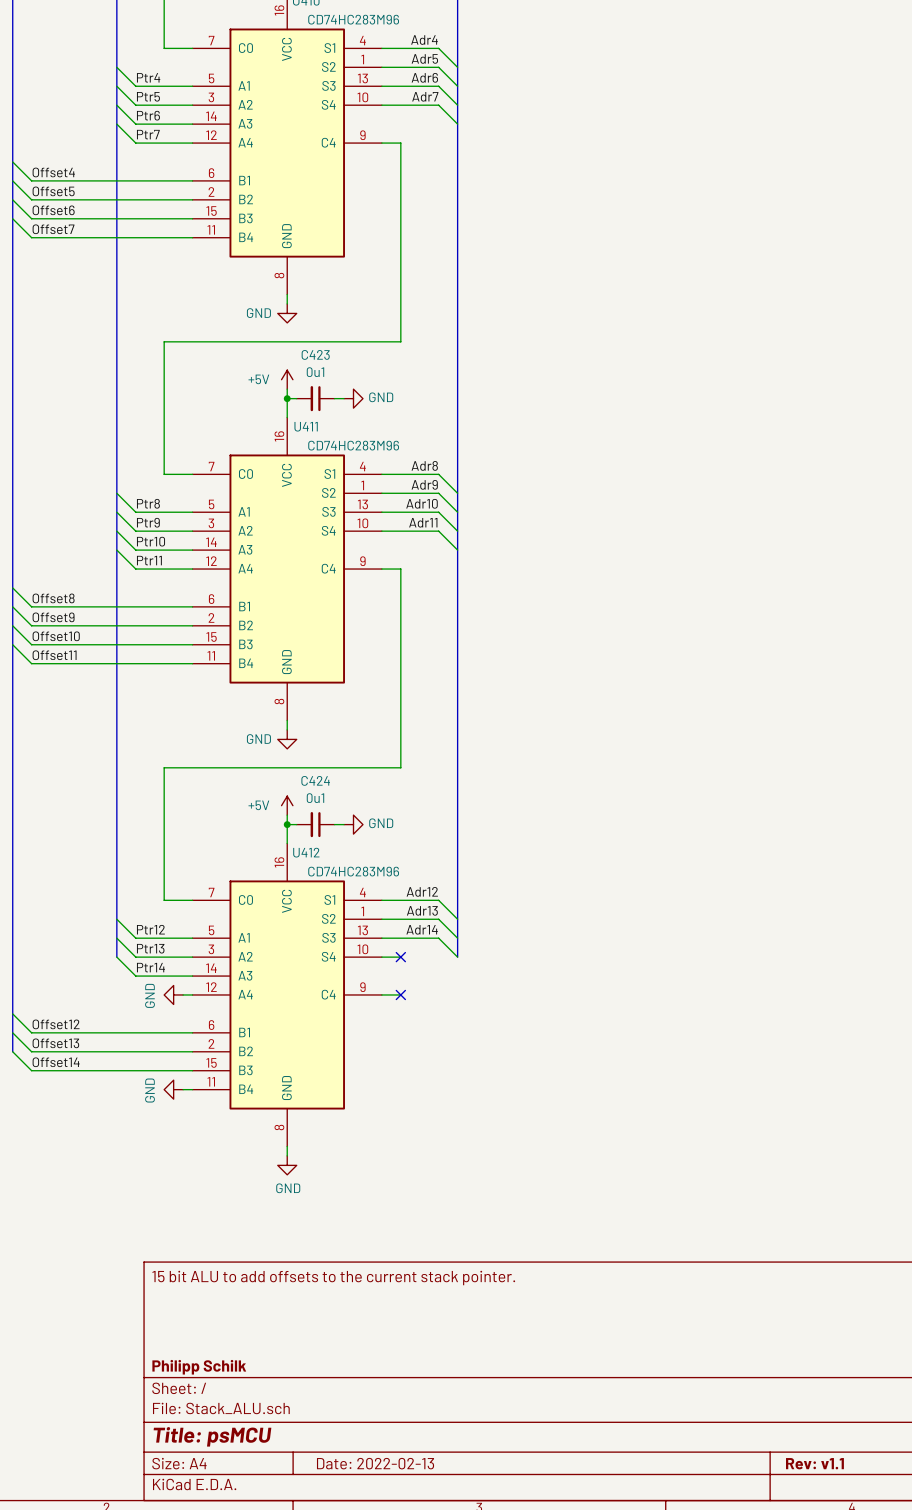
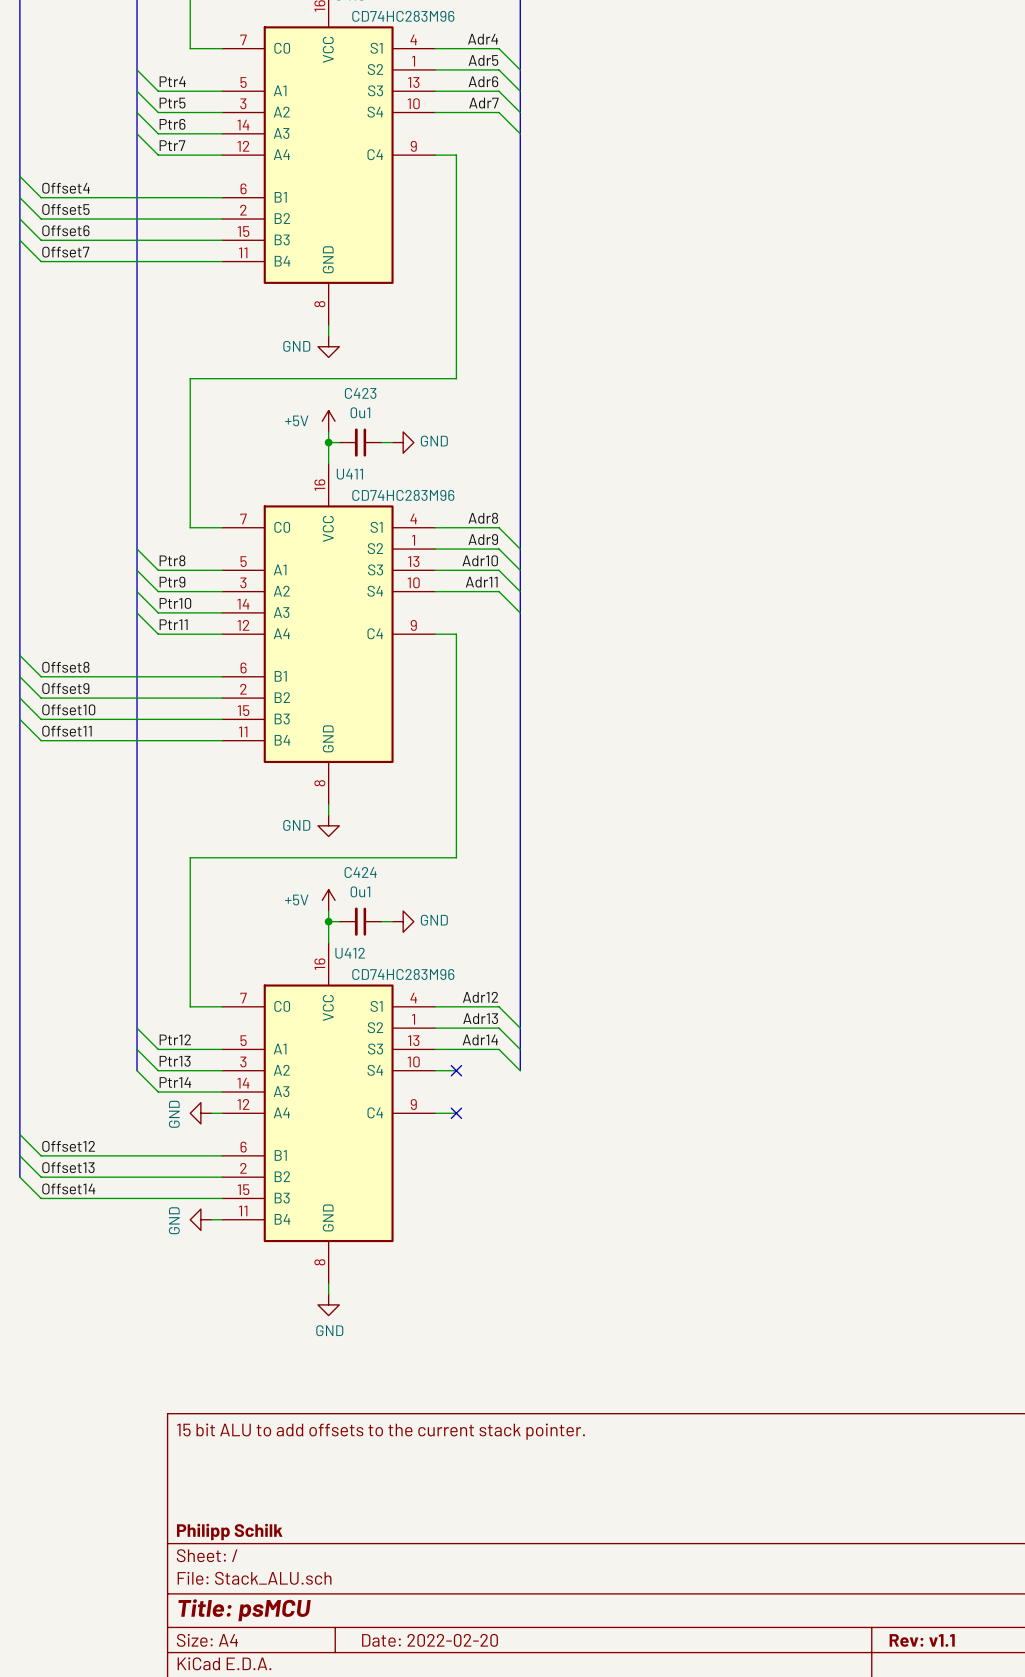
title block: Date: 2022-02-13 (375, 1463) -> Date: 2022-02-20 (430, 1640)

